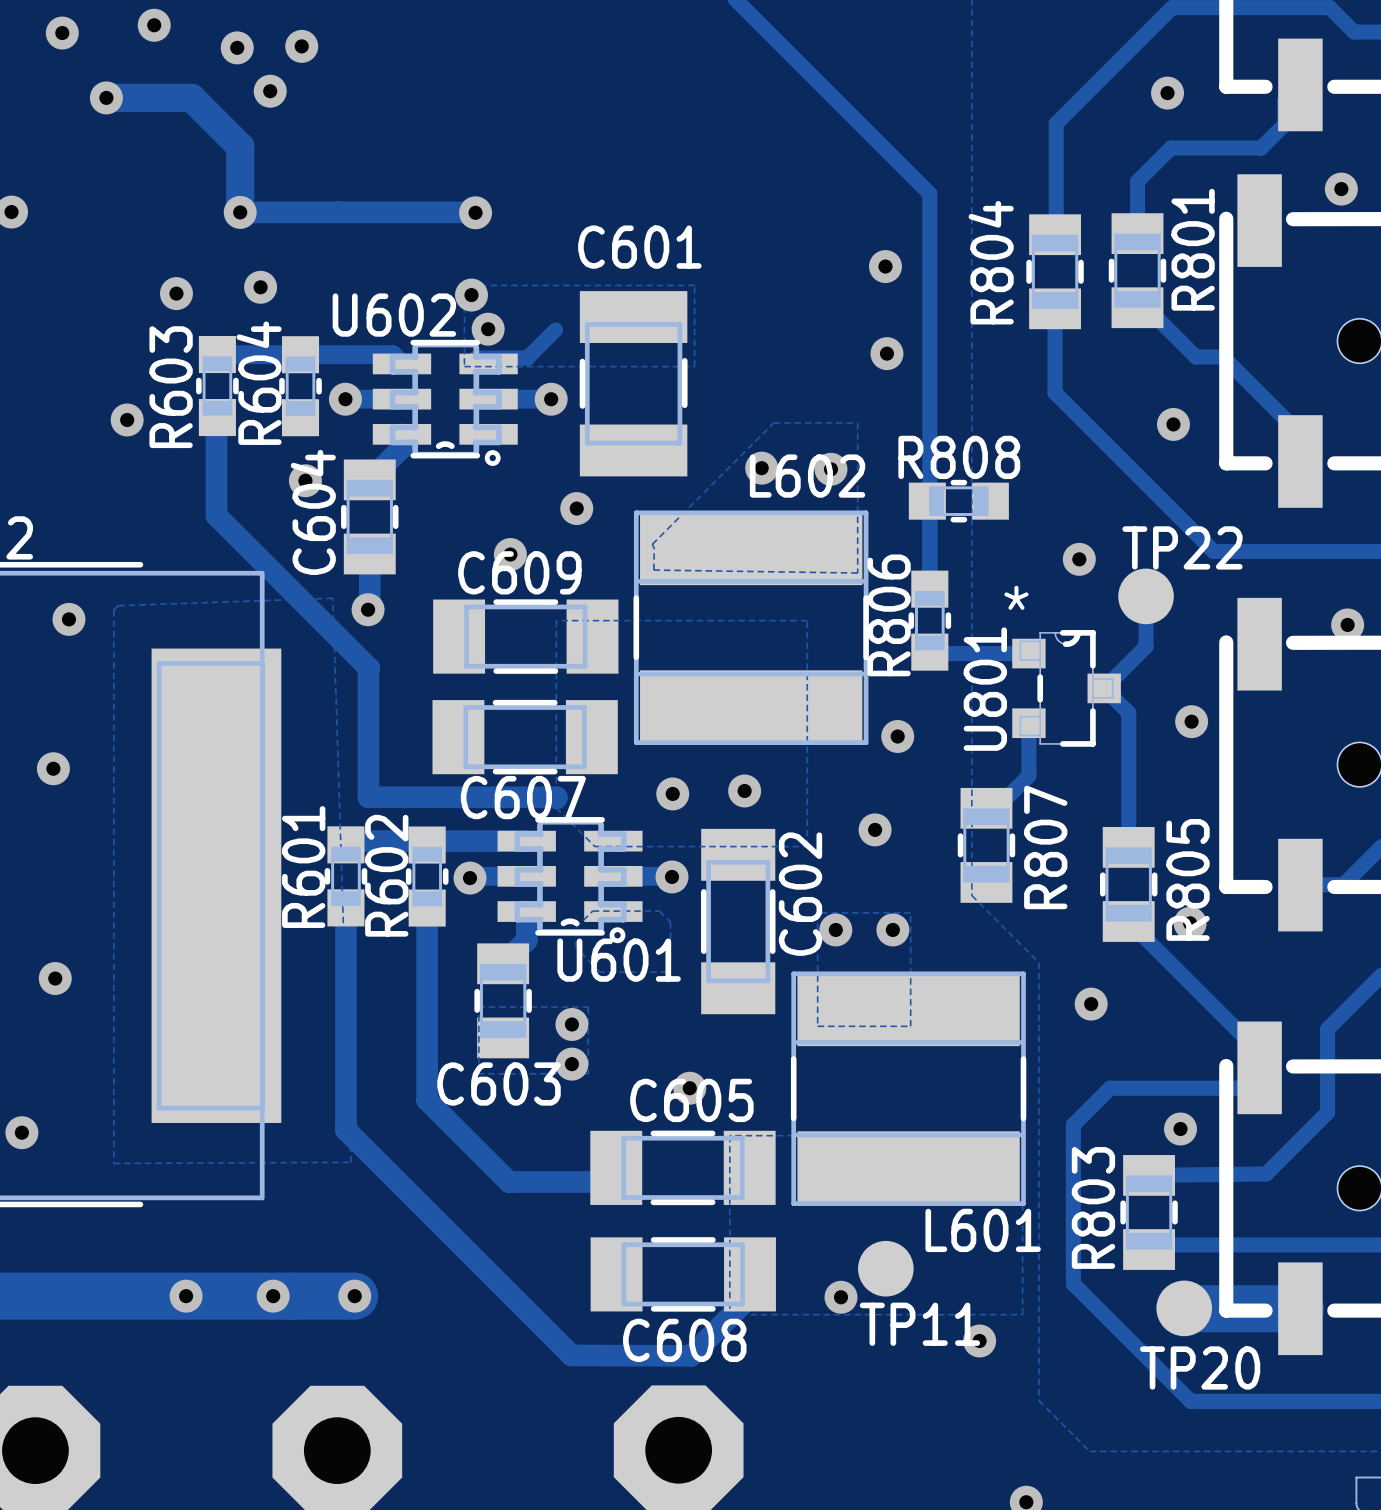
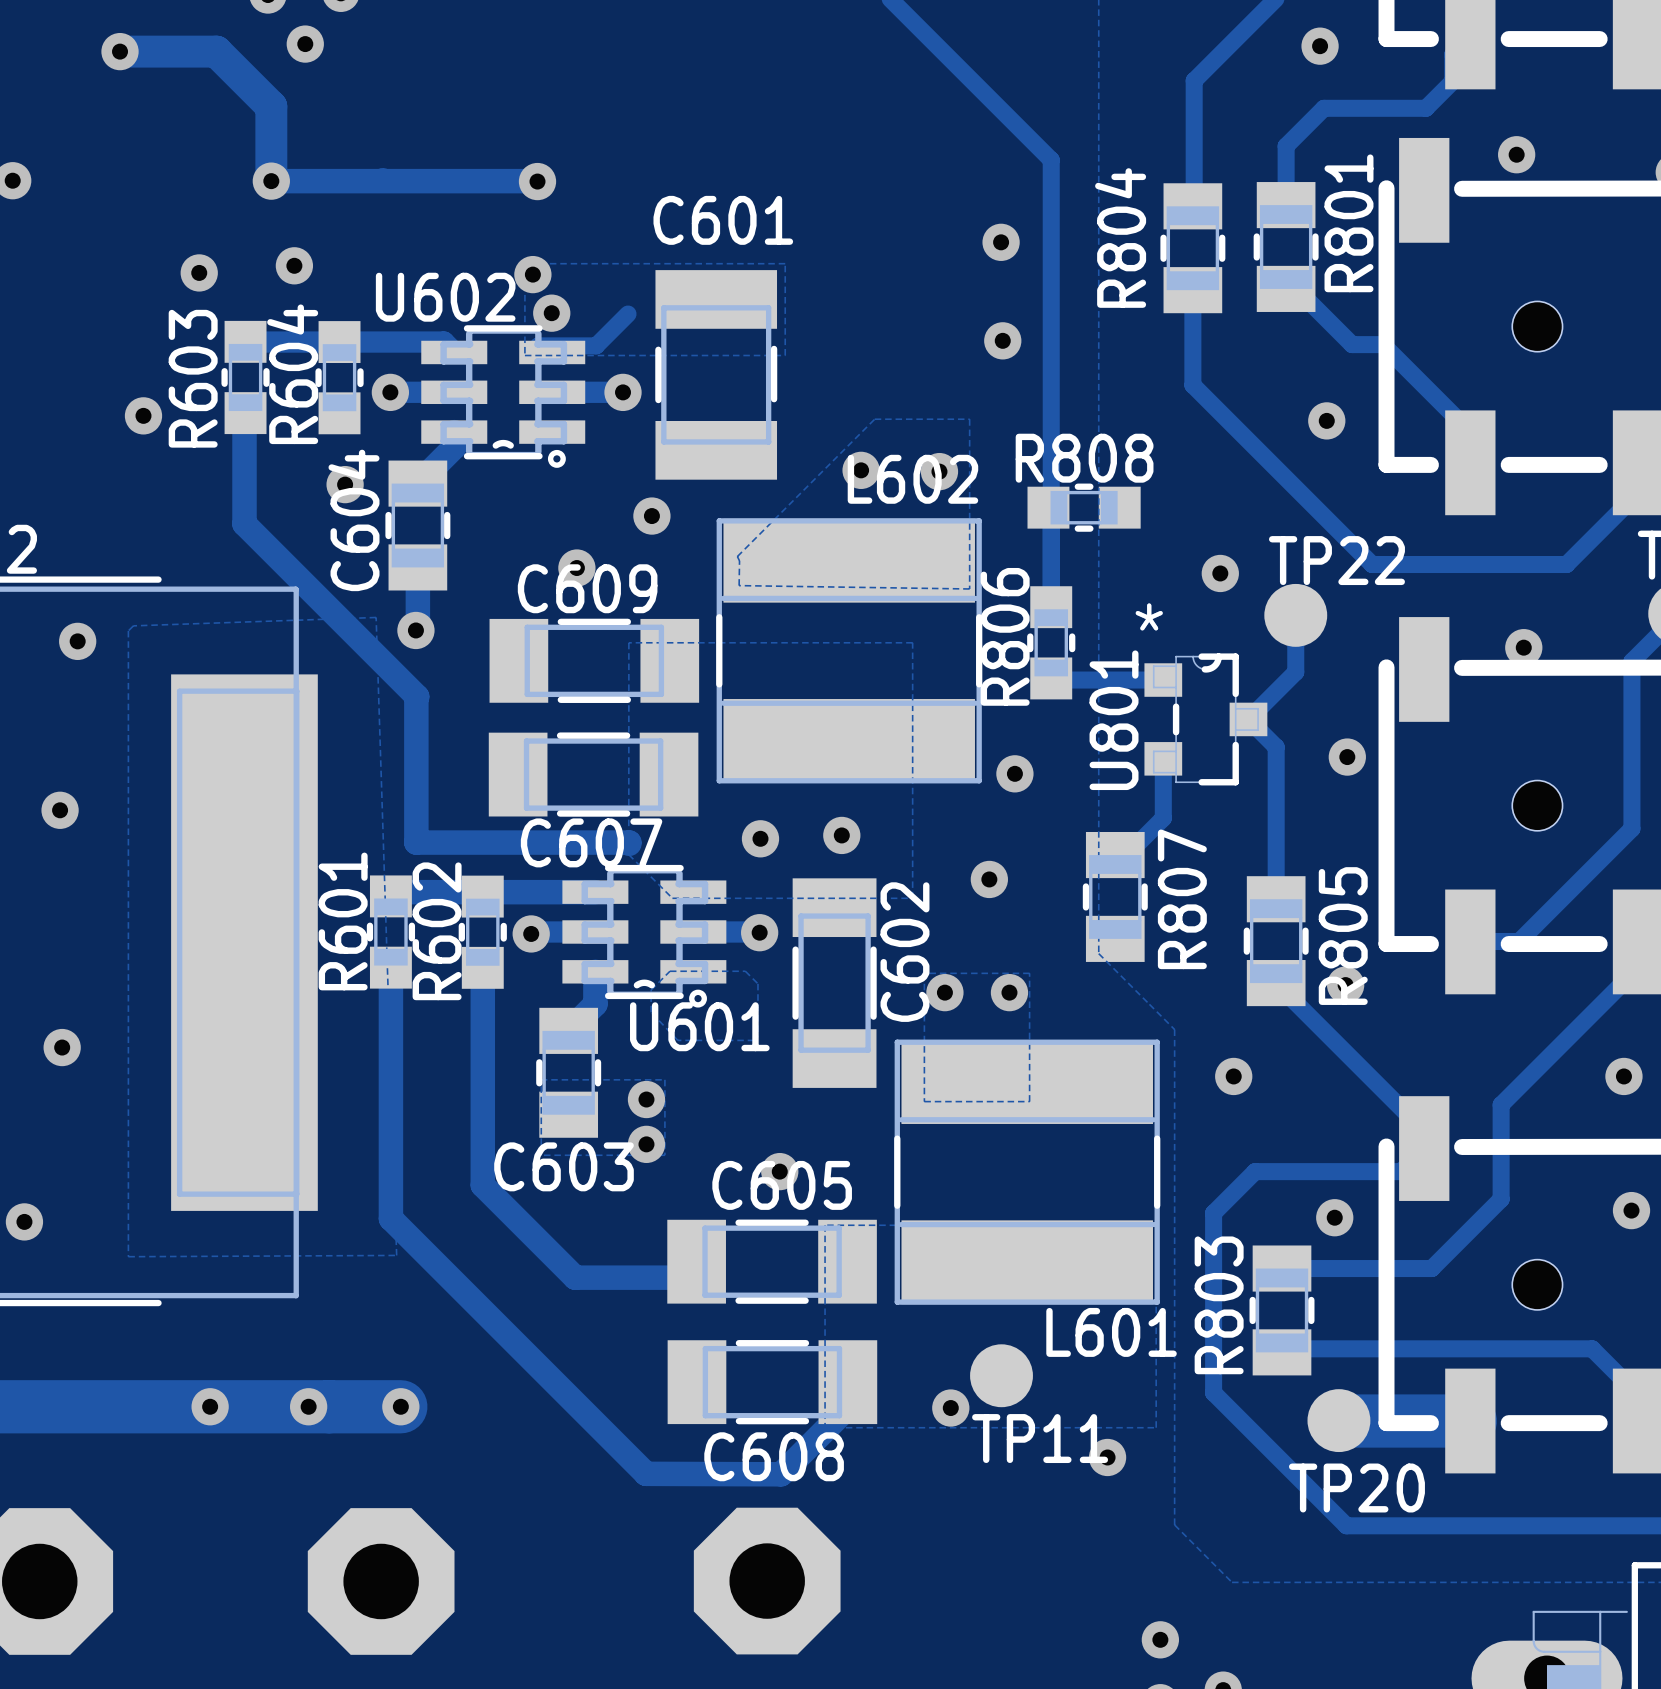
track: (1266, 1173) (1149, 1175) -> (1431, 1268) (1282, 1268)
R803 position: (1149, 1212) -> (1282, 1310)

